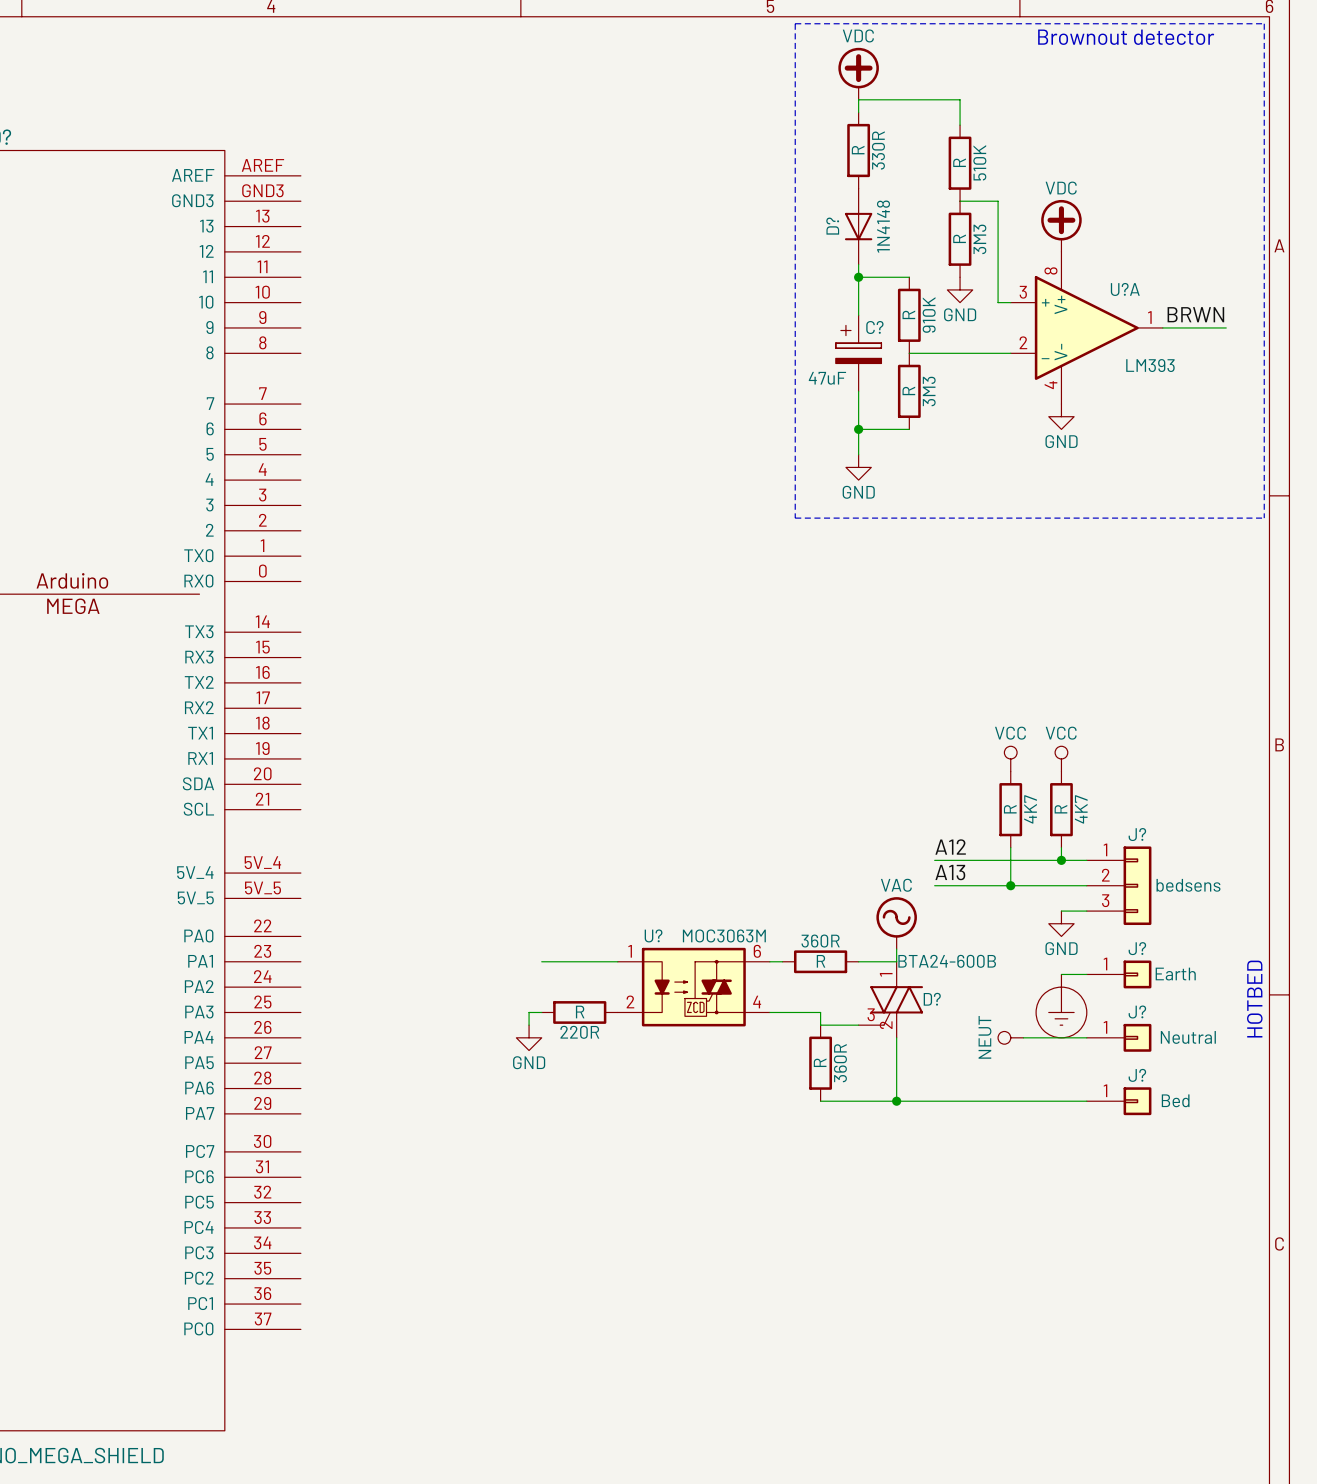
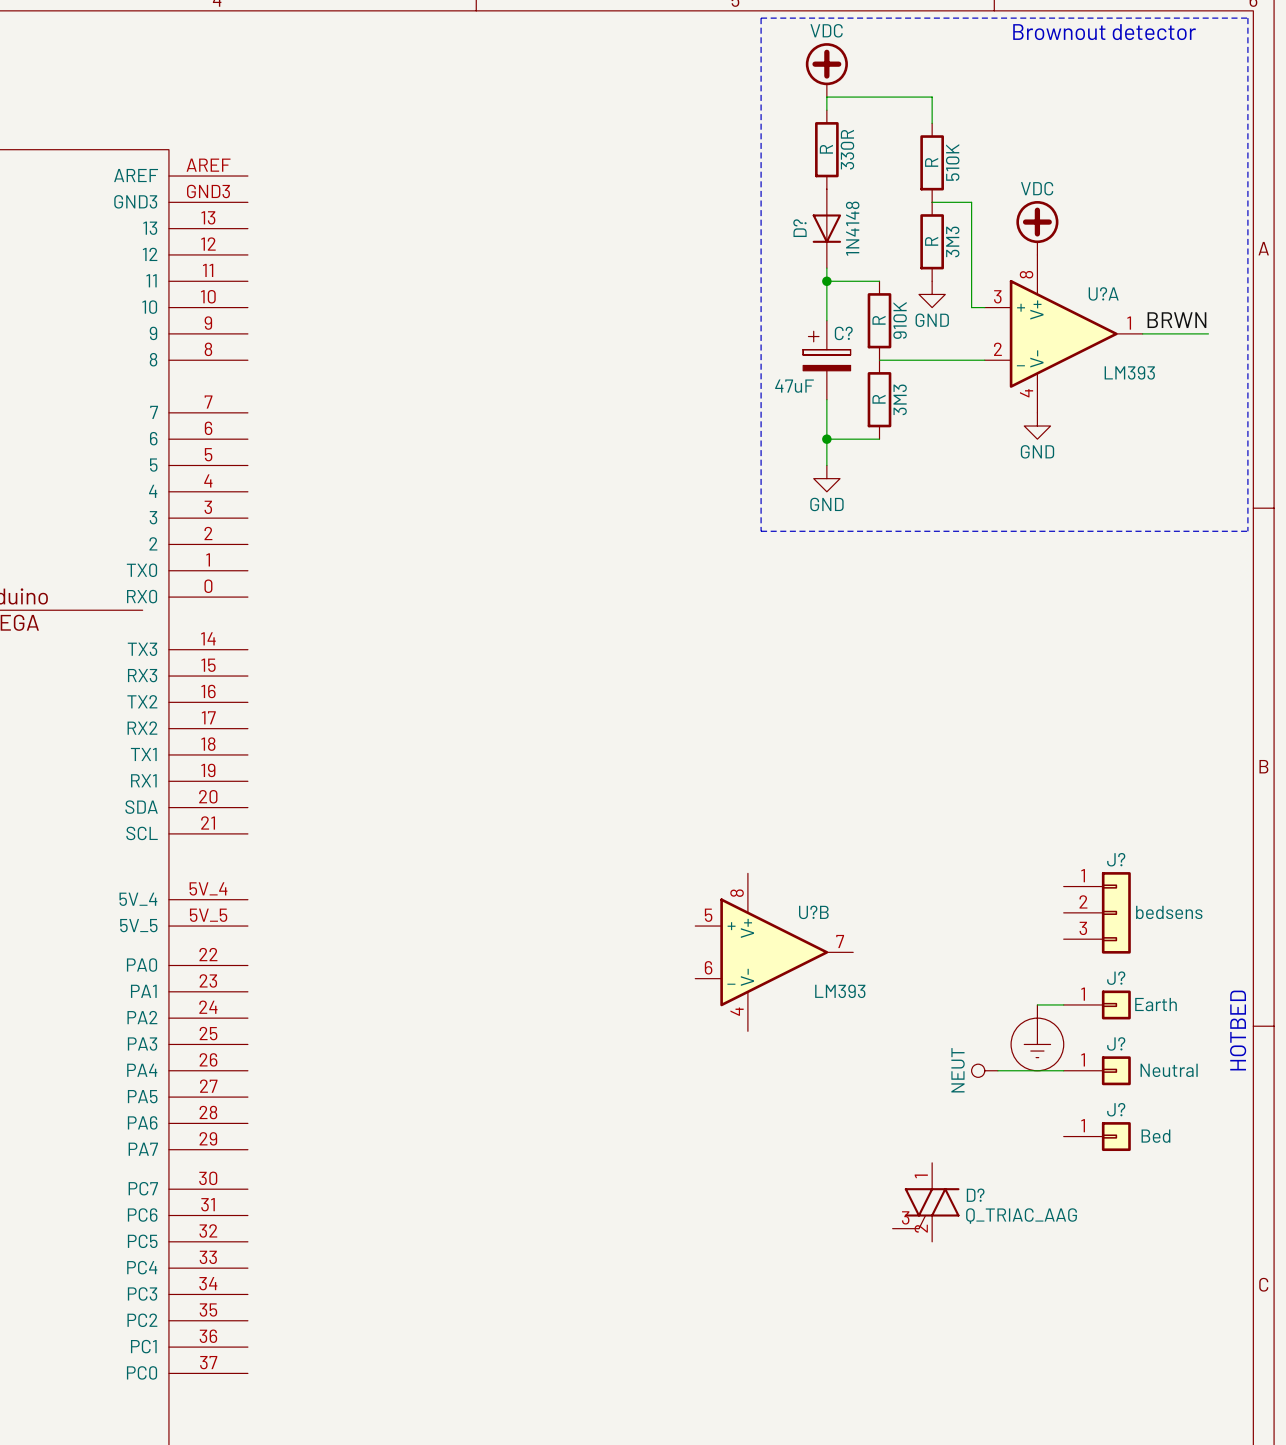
power symbol: VCC (1010, 758) -> none
power symbol: VCC (1061, 758) -> none
4K7: R (1010, 809) -> none
4K7: R (1061, 809) -> none
label: A12 (950, 847) -> none
wire: (1010, 847) (1010, 885) -> none
wire: (1061, 847) (1061, 860) -> none
wire: (934, 860) (1086, 860) -> none
junction: (1061, 860) -> none
label: A13 (950, 872) -> none
wire: (934, 885) (1086, 885) -> none
junction: (1010, 885) -> none
wire: (1061, 911) (1086, 911) -> none
U?B: none -> LM393 (774, 952)
power symbol: VAC (896, 923) -> none
power symbol: GND (1061, 923) -> none
wire: (896, 949) (896, 961) (858, 961) -> none
wire: (541, 961) (617, 961) -> none
360R: R (820, 961) -> none
U?: MOC3063M (693, 987) -> none
D?: BTA24-600B (890, 999) -> none
wire: (541, 1012) (529, 1012) (529, 1025) -> none
220R: R (579, 1012) -> none
wire: (769, 1012) (820, 1012) (820, 1025) (858, 1025) -> none
power symbol: GND (529, 1037) -> none
wire: (896, 1037) (896, 1101) -> none
360R: R (820, 1063) -> none
wire: (820, 1101) (1086, 1101) -> none
junction: (896, 1101) -> none
D?: none -> Q_TRIAC_AAG (926, 1202)

